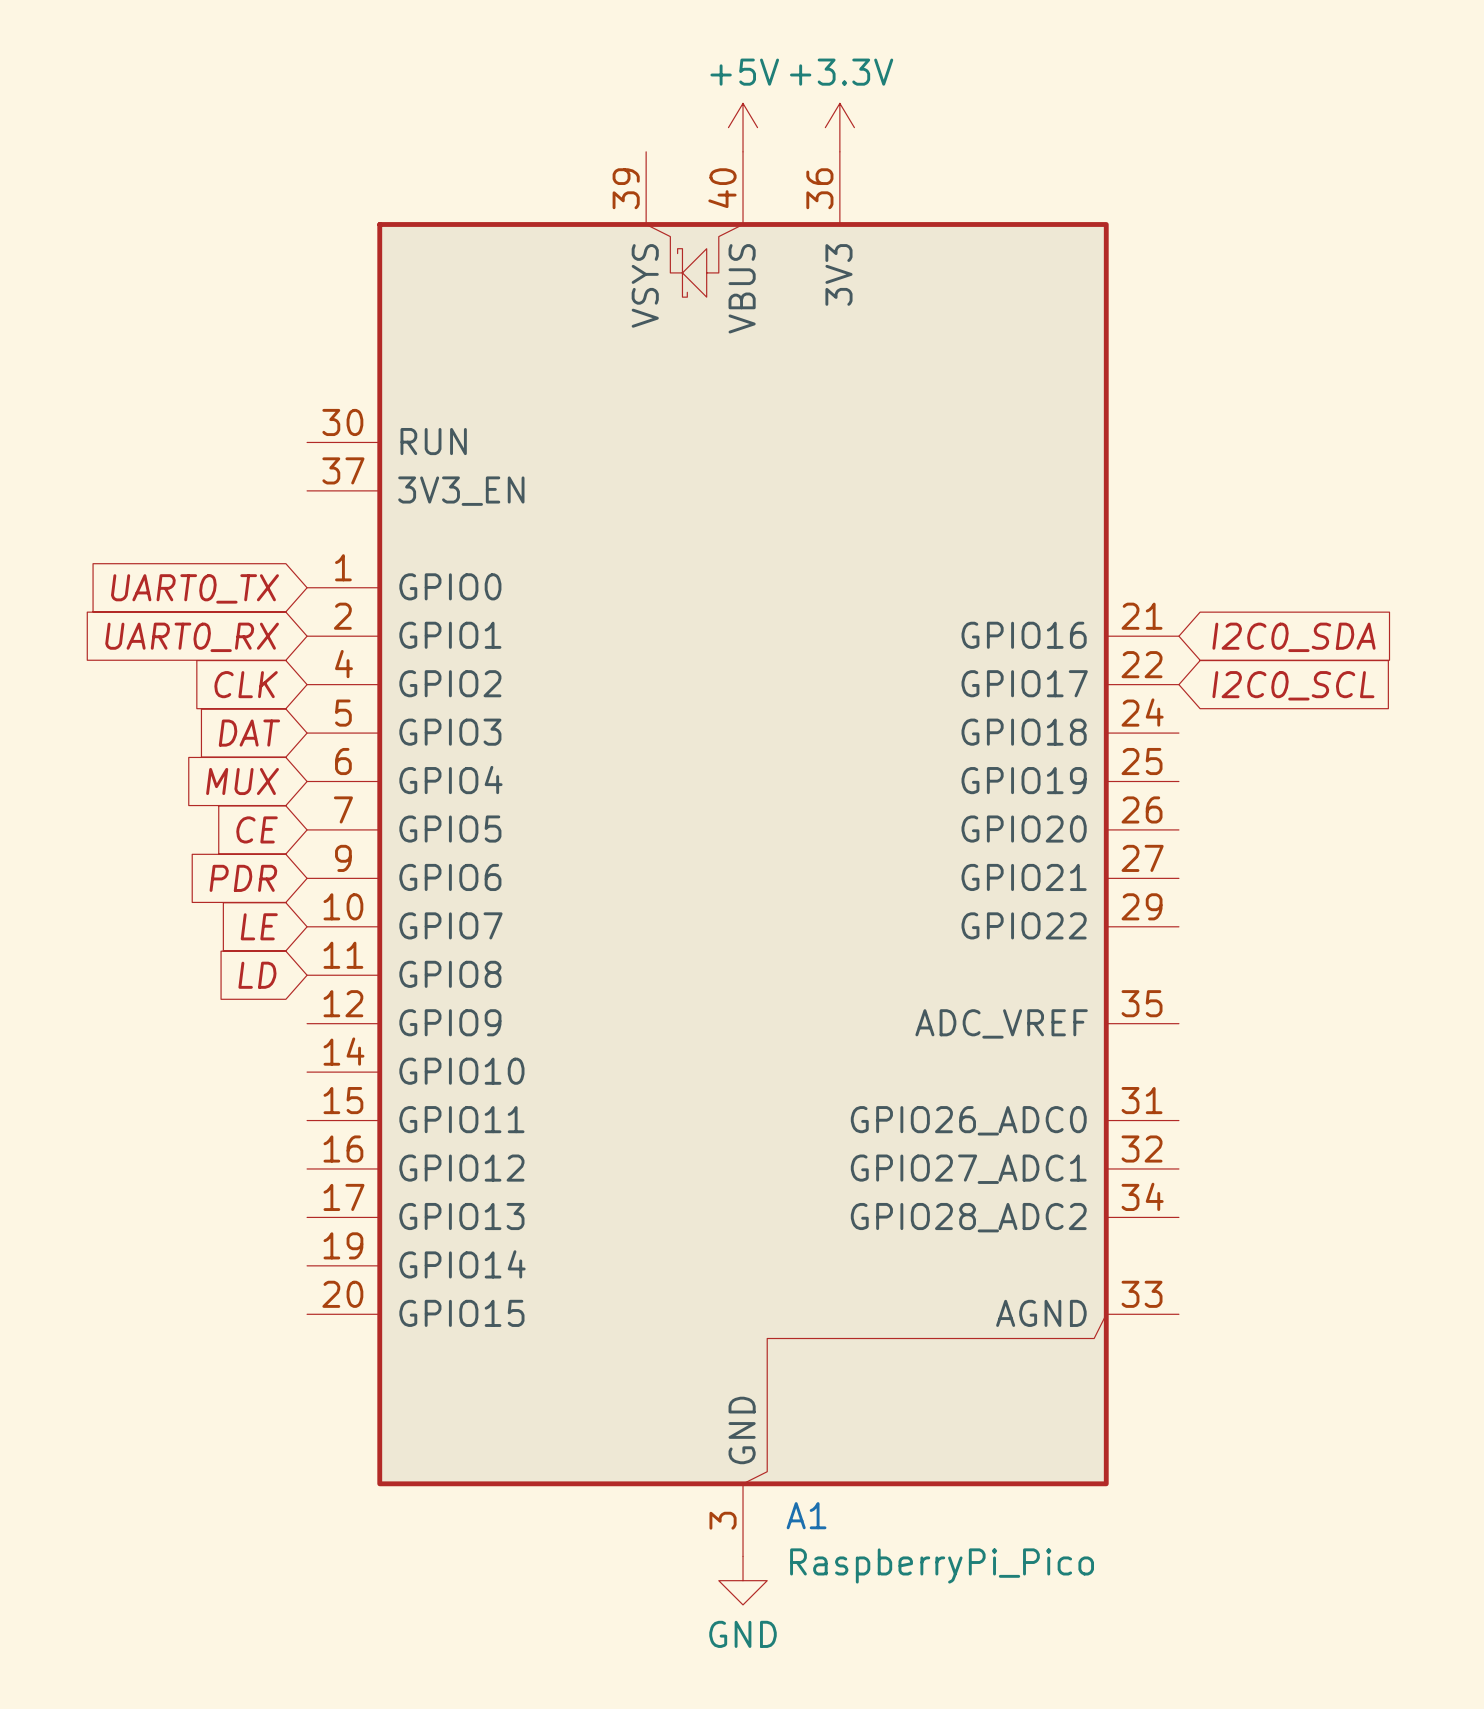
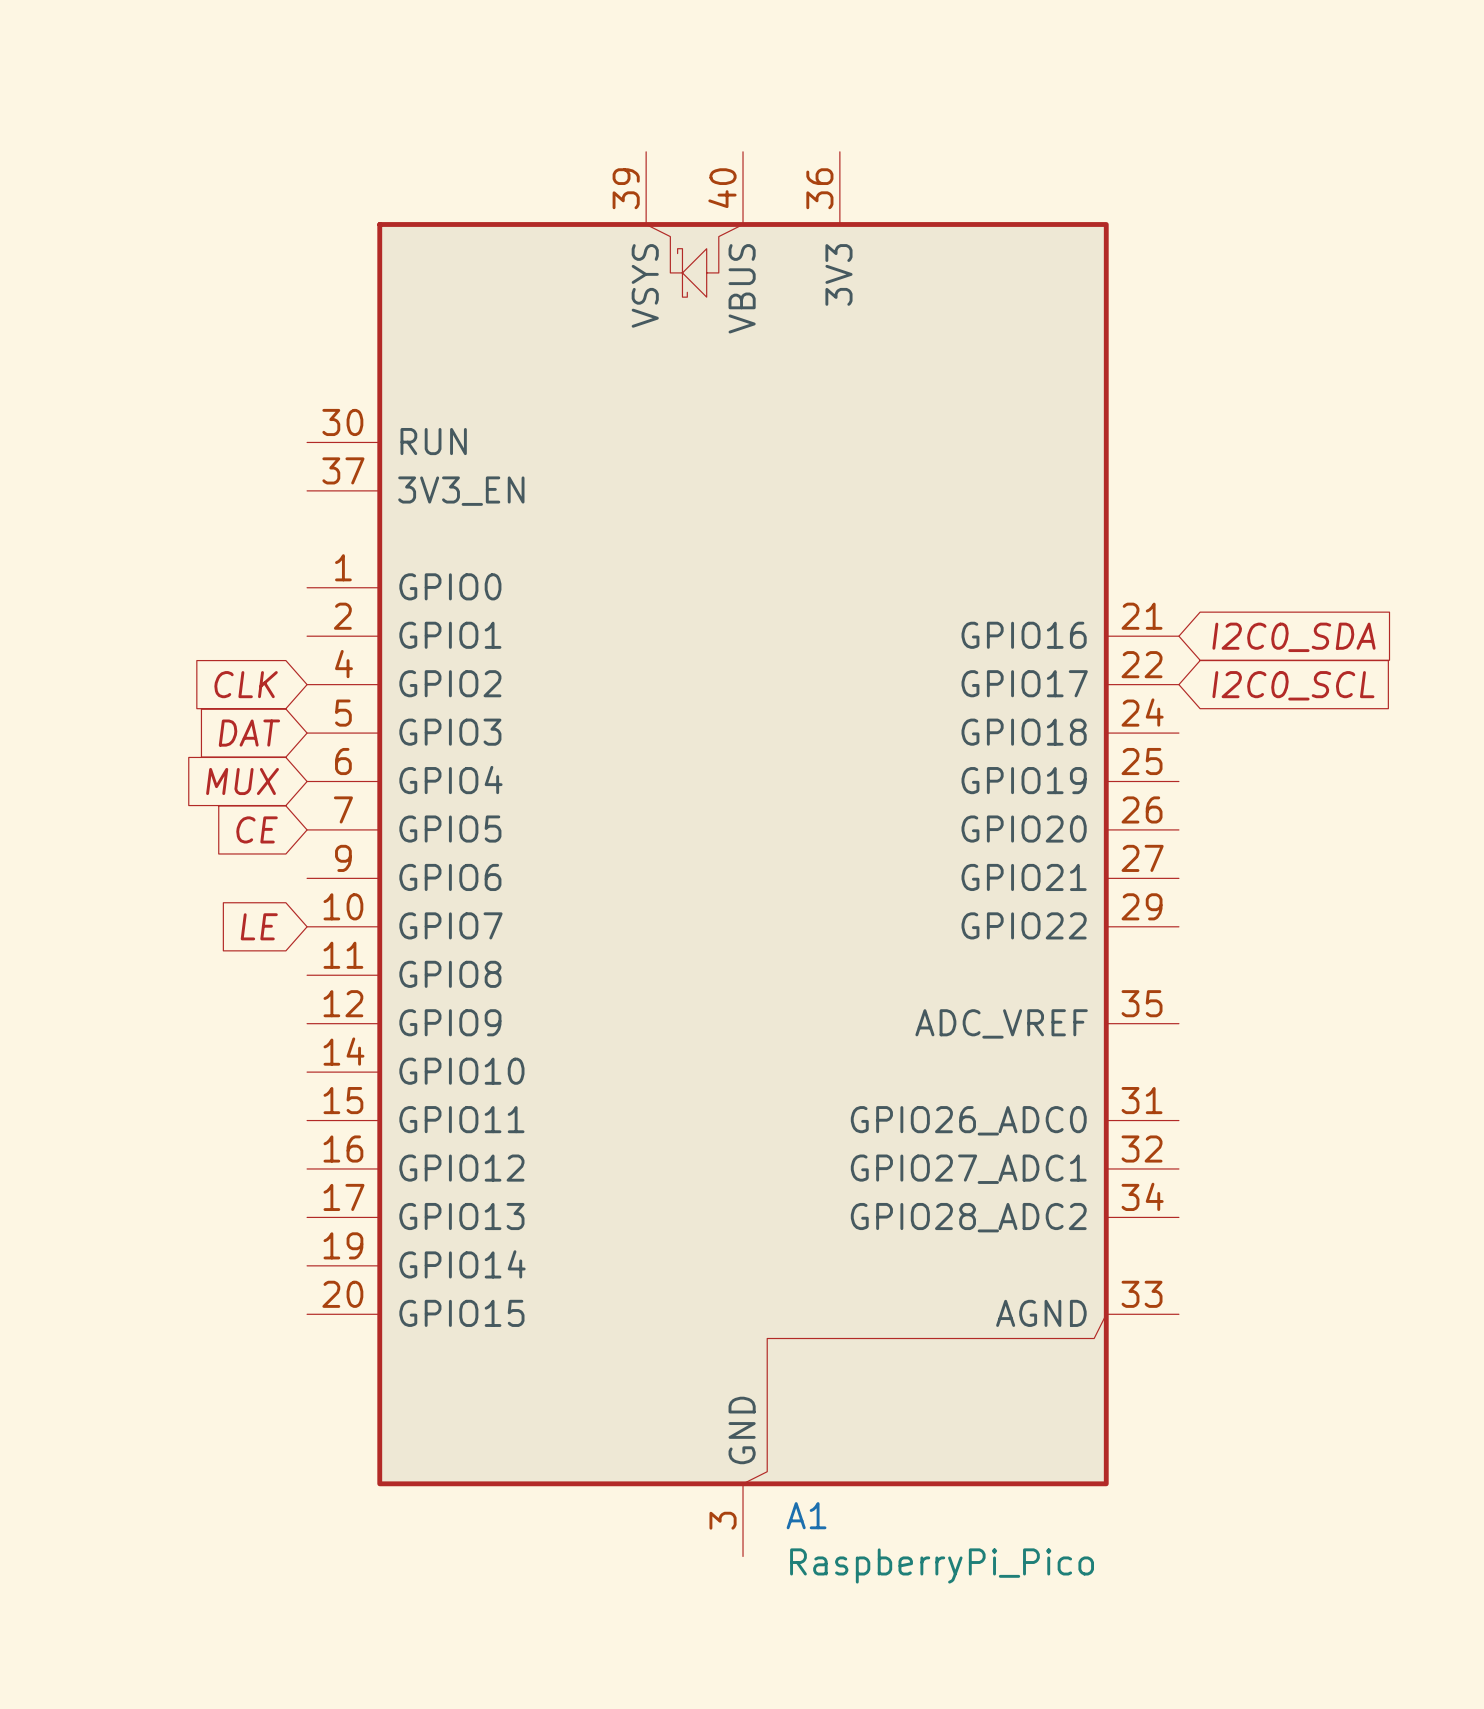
power symbol: +5V (743, 127) -> none
power symbol: +3.3V (839, 127) -> none
global label: UART0_TX (194, 588) -> none
global label: UART0_RX (192, 637) -> none
global label: PDR (243, 878) -> none
global label: LD (257, 975) -> none
power symbol: GND (743, 1580) -> none

